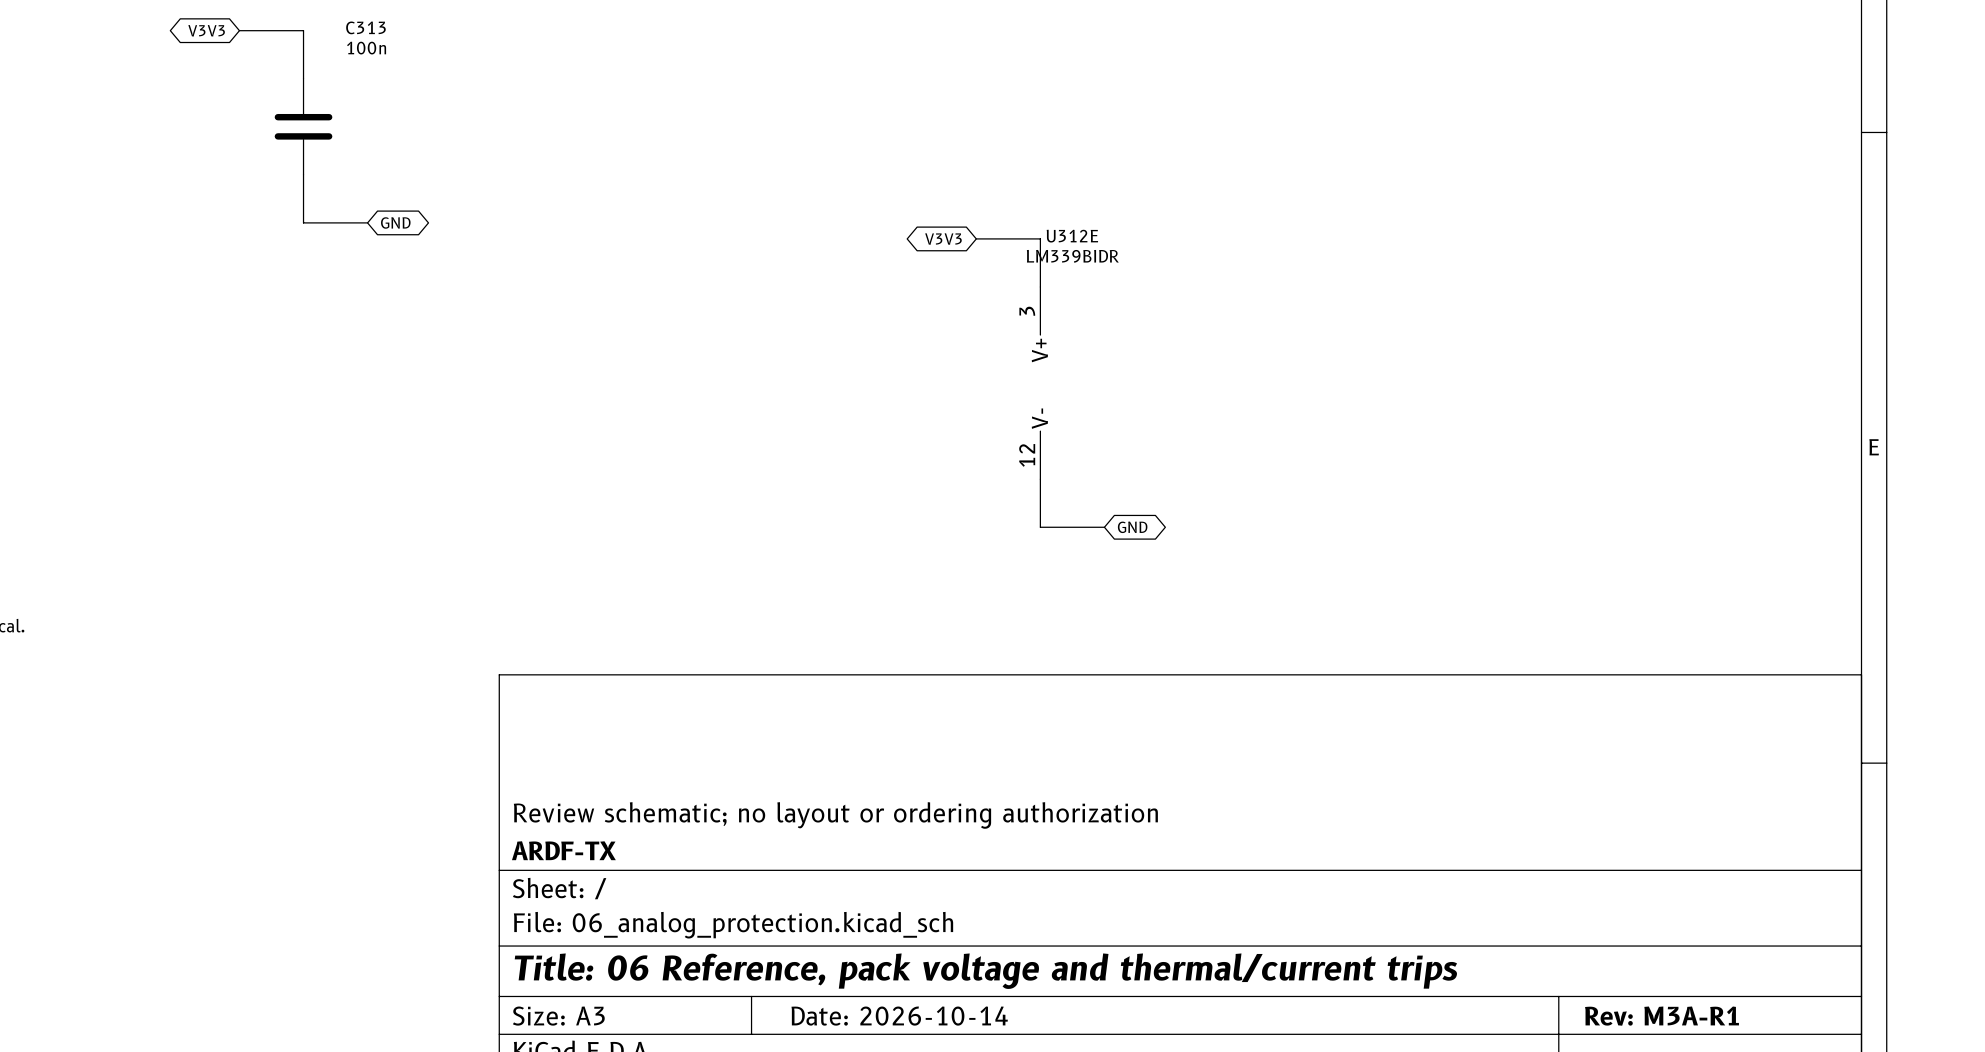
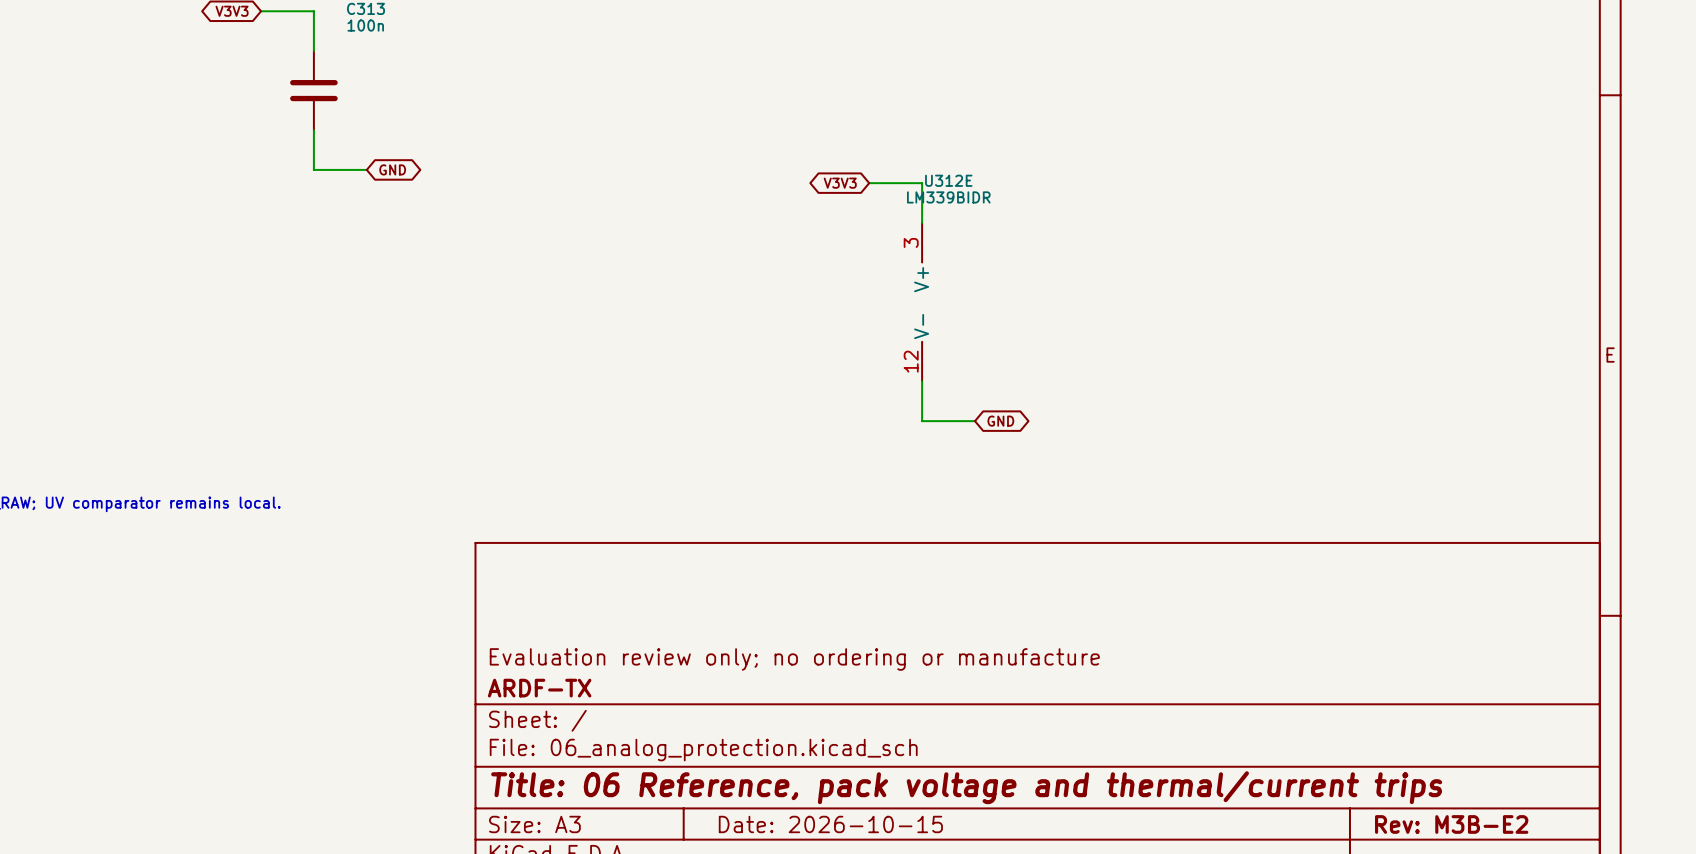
title block: Review schematic; no layout or ordering authorization (835, 815) -> Evaluation review only; no ordering or manufacture (794, 659)
title block: Date: 2026-10-14 (899, 1016) -> Date: 2026-10-15 (830, 824)
title block: Rev: M3A-R1 (1662, 1016) -> Rev: M3B-E2 (1451, 824)

